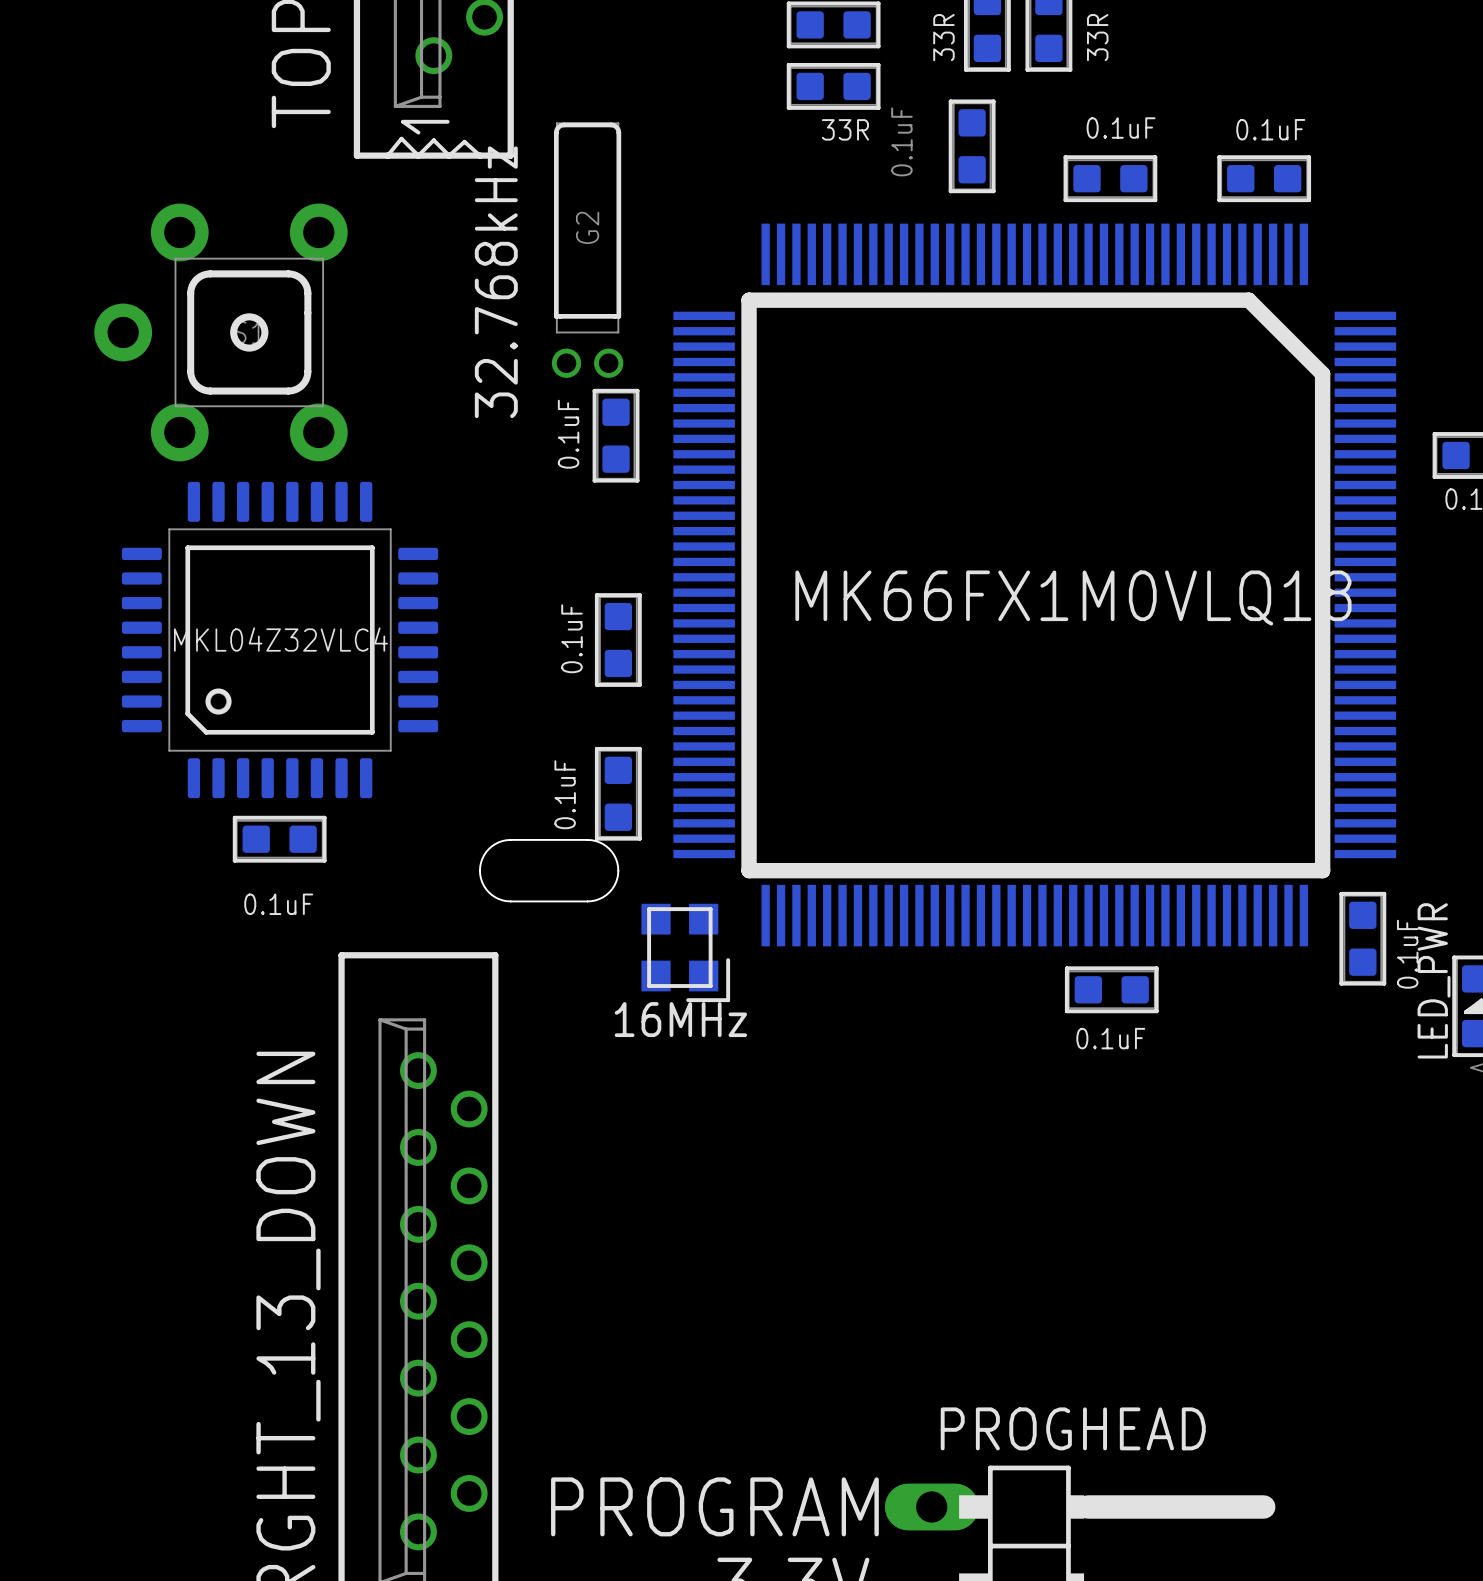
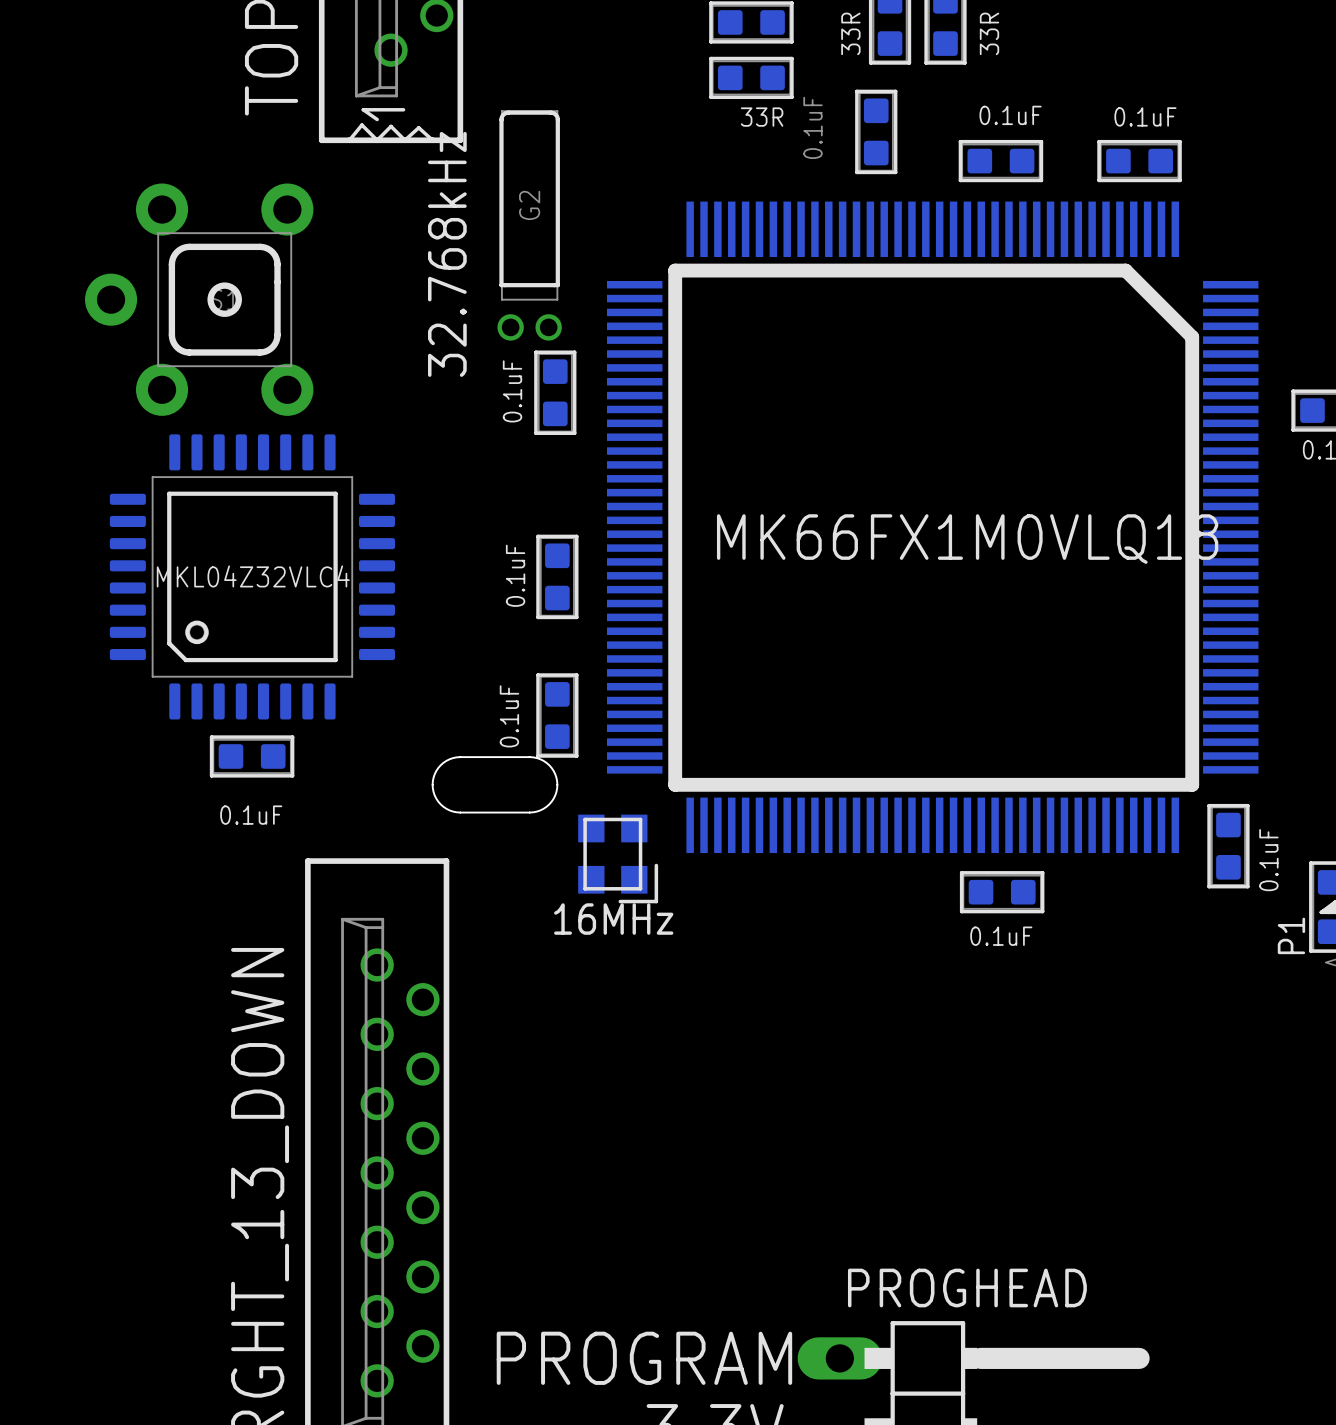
LED_PWR name: LED_PWR (1434, 980) -> P1 (1291, 935)

